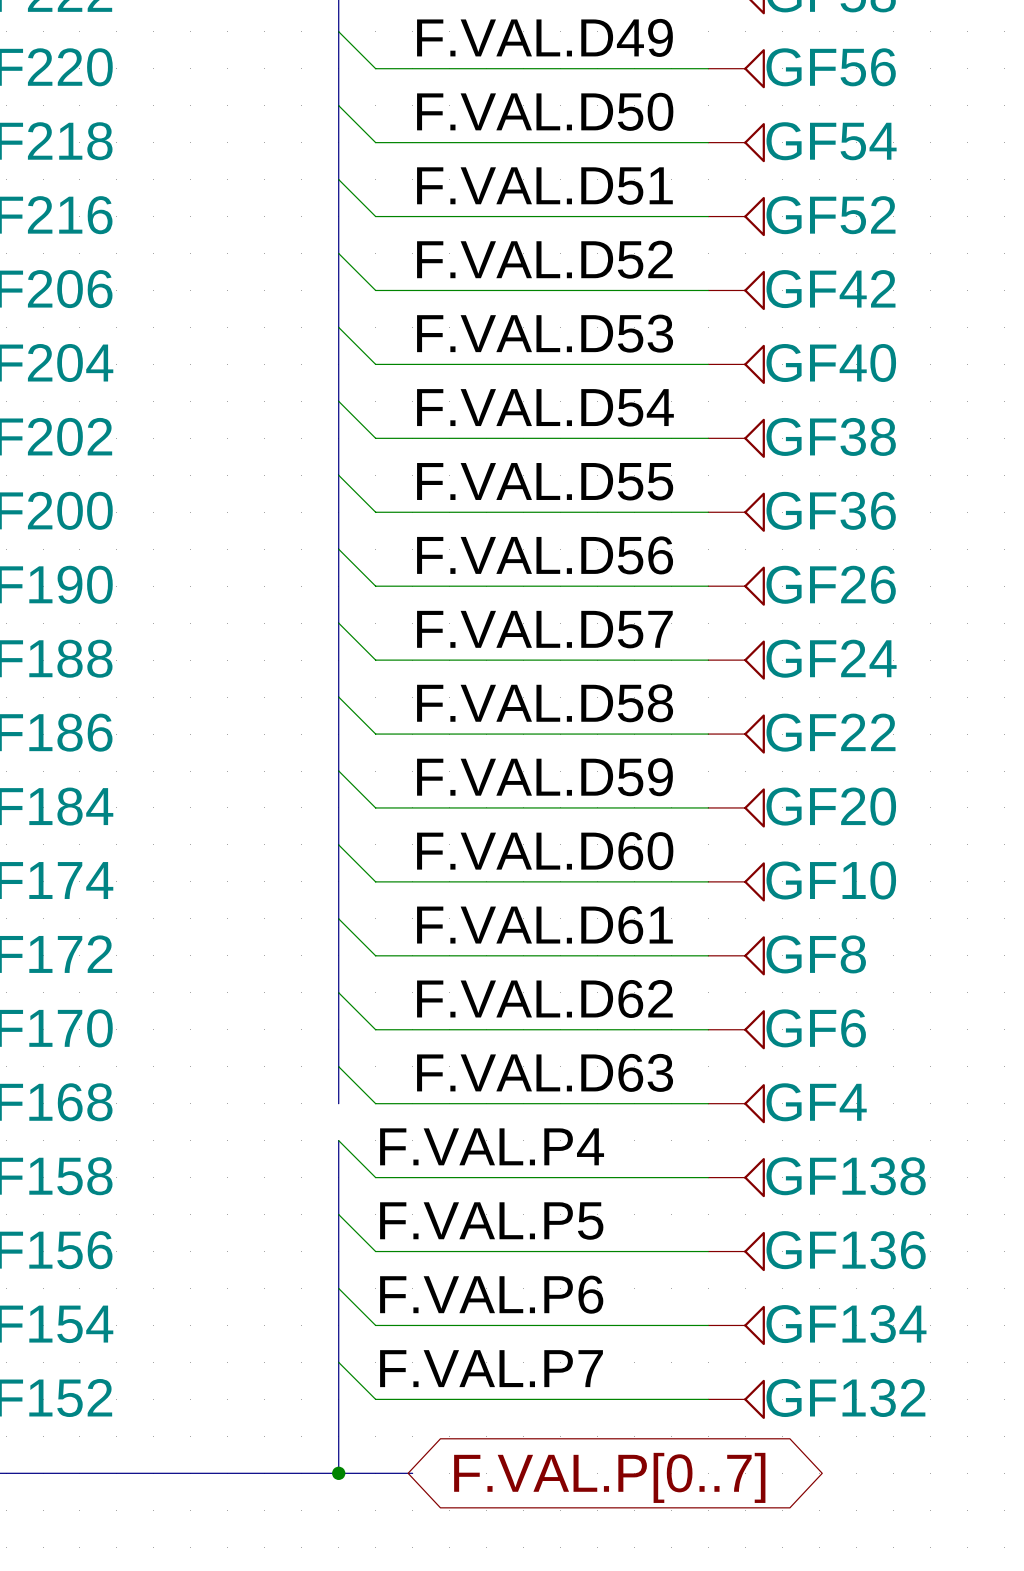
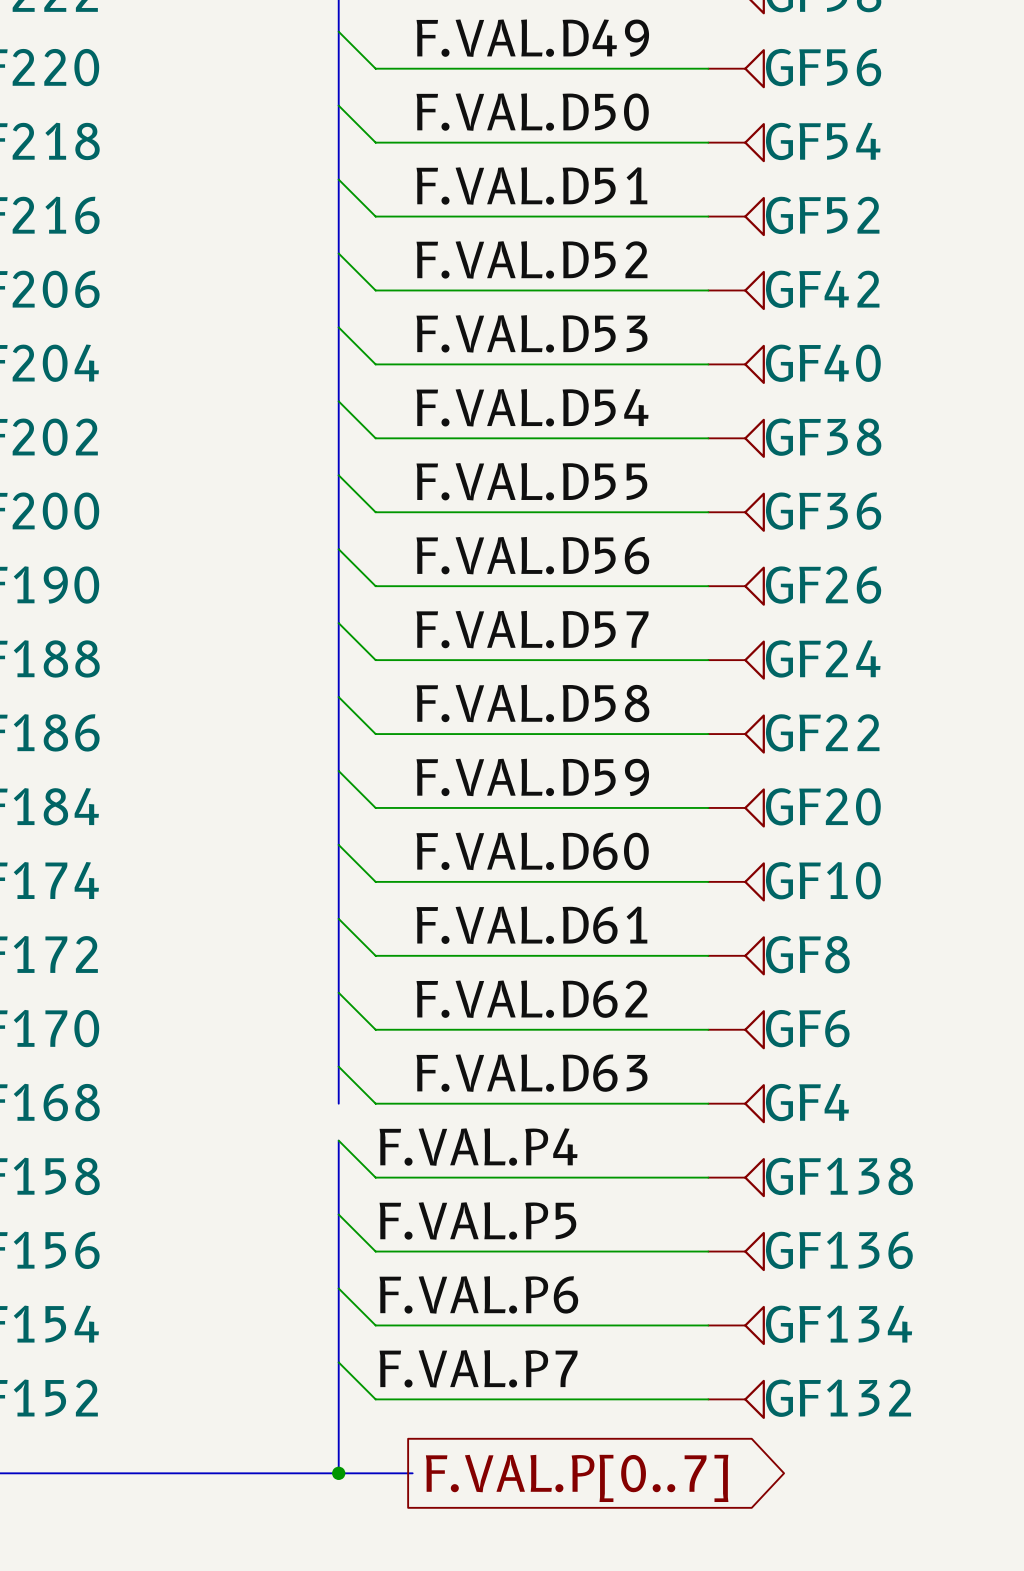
global label shape: bidirectional (609, 1477) -> output (577, 1478)

